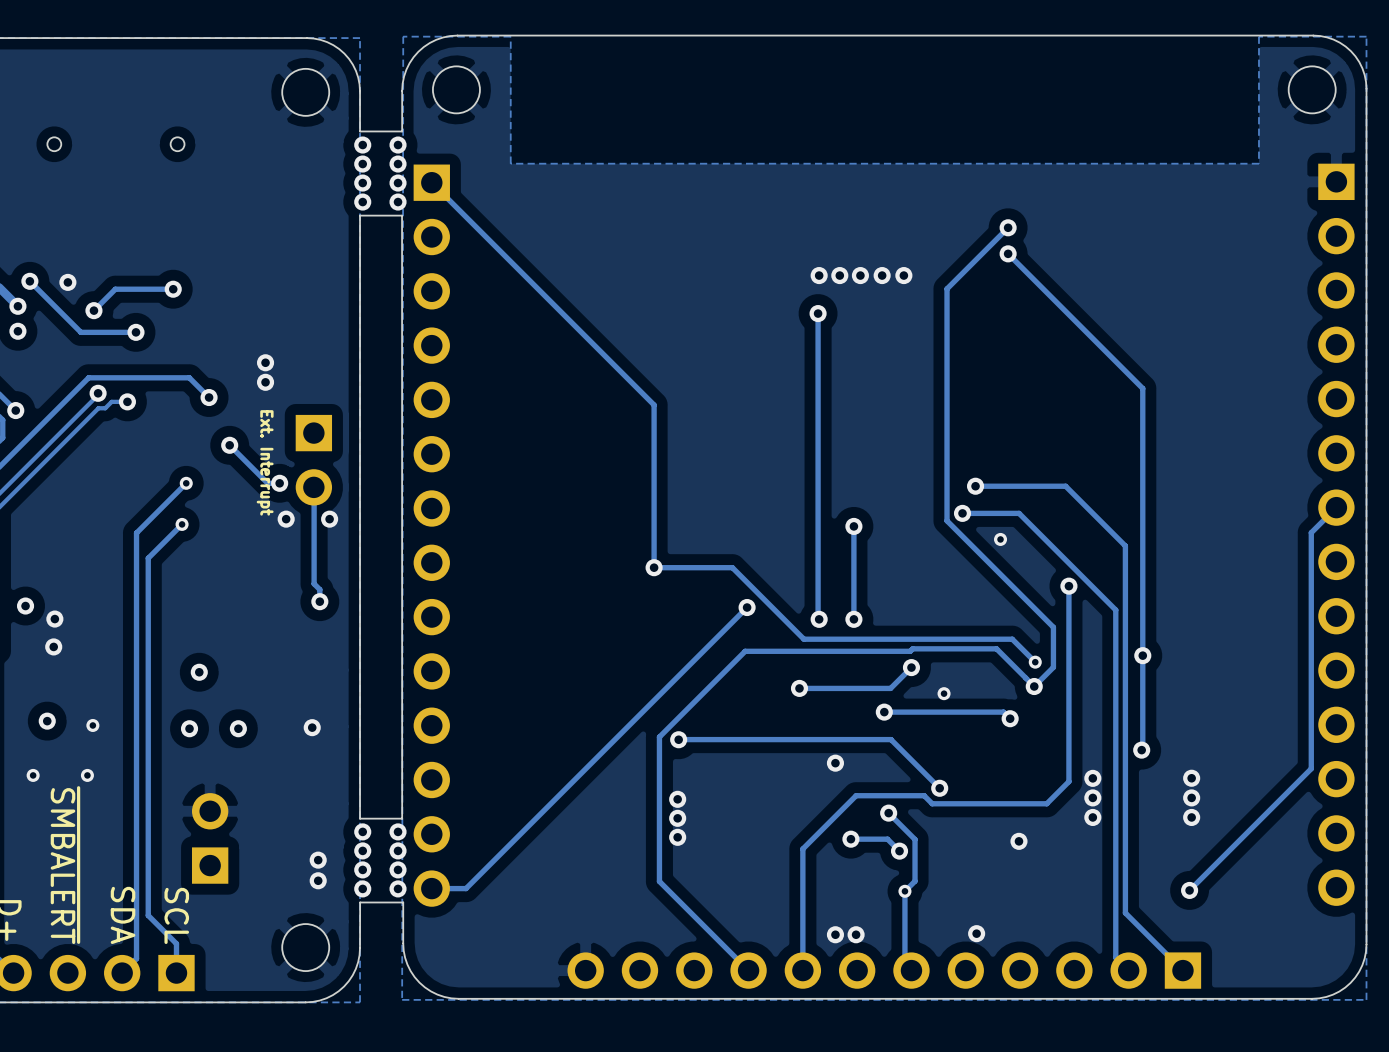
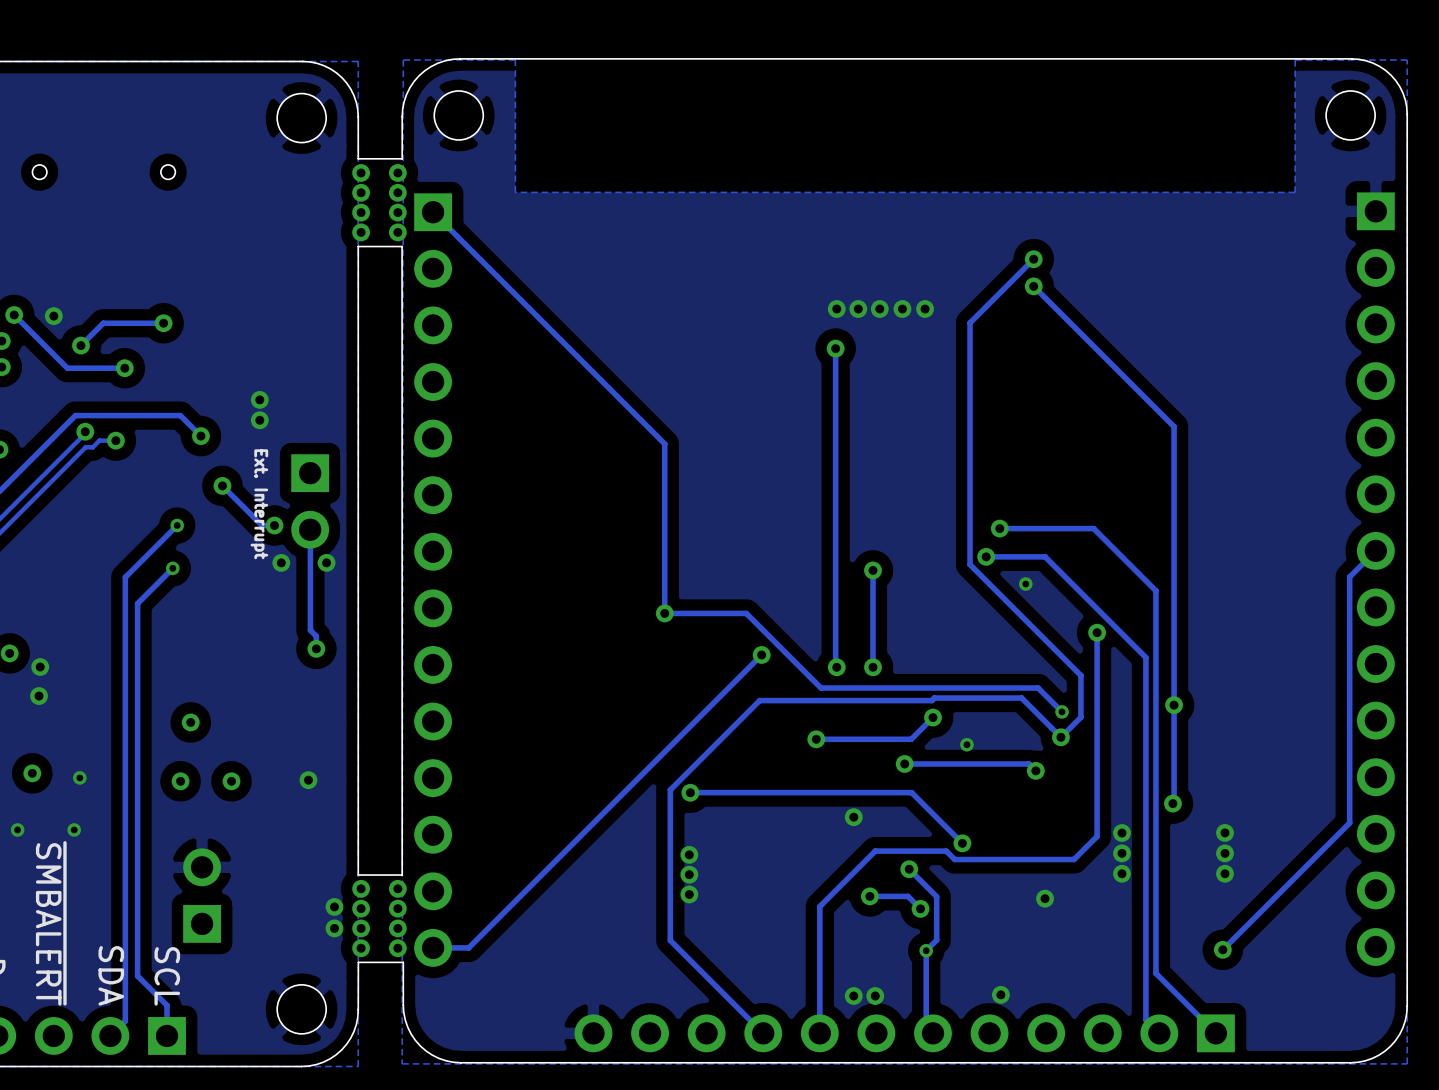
via: none -> (334, 906)
via: (318, 860) -> none
via: none -> (334, 928)
via: (318, 880) -> none

